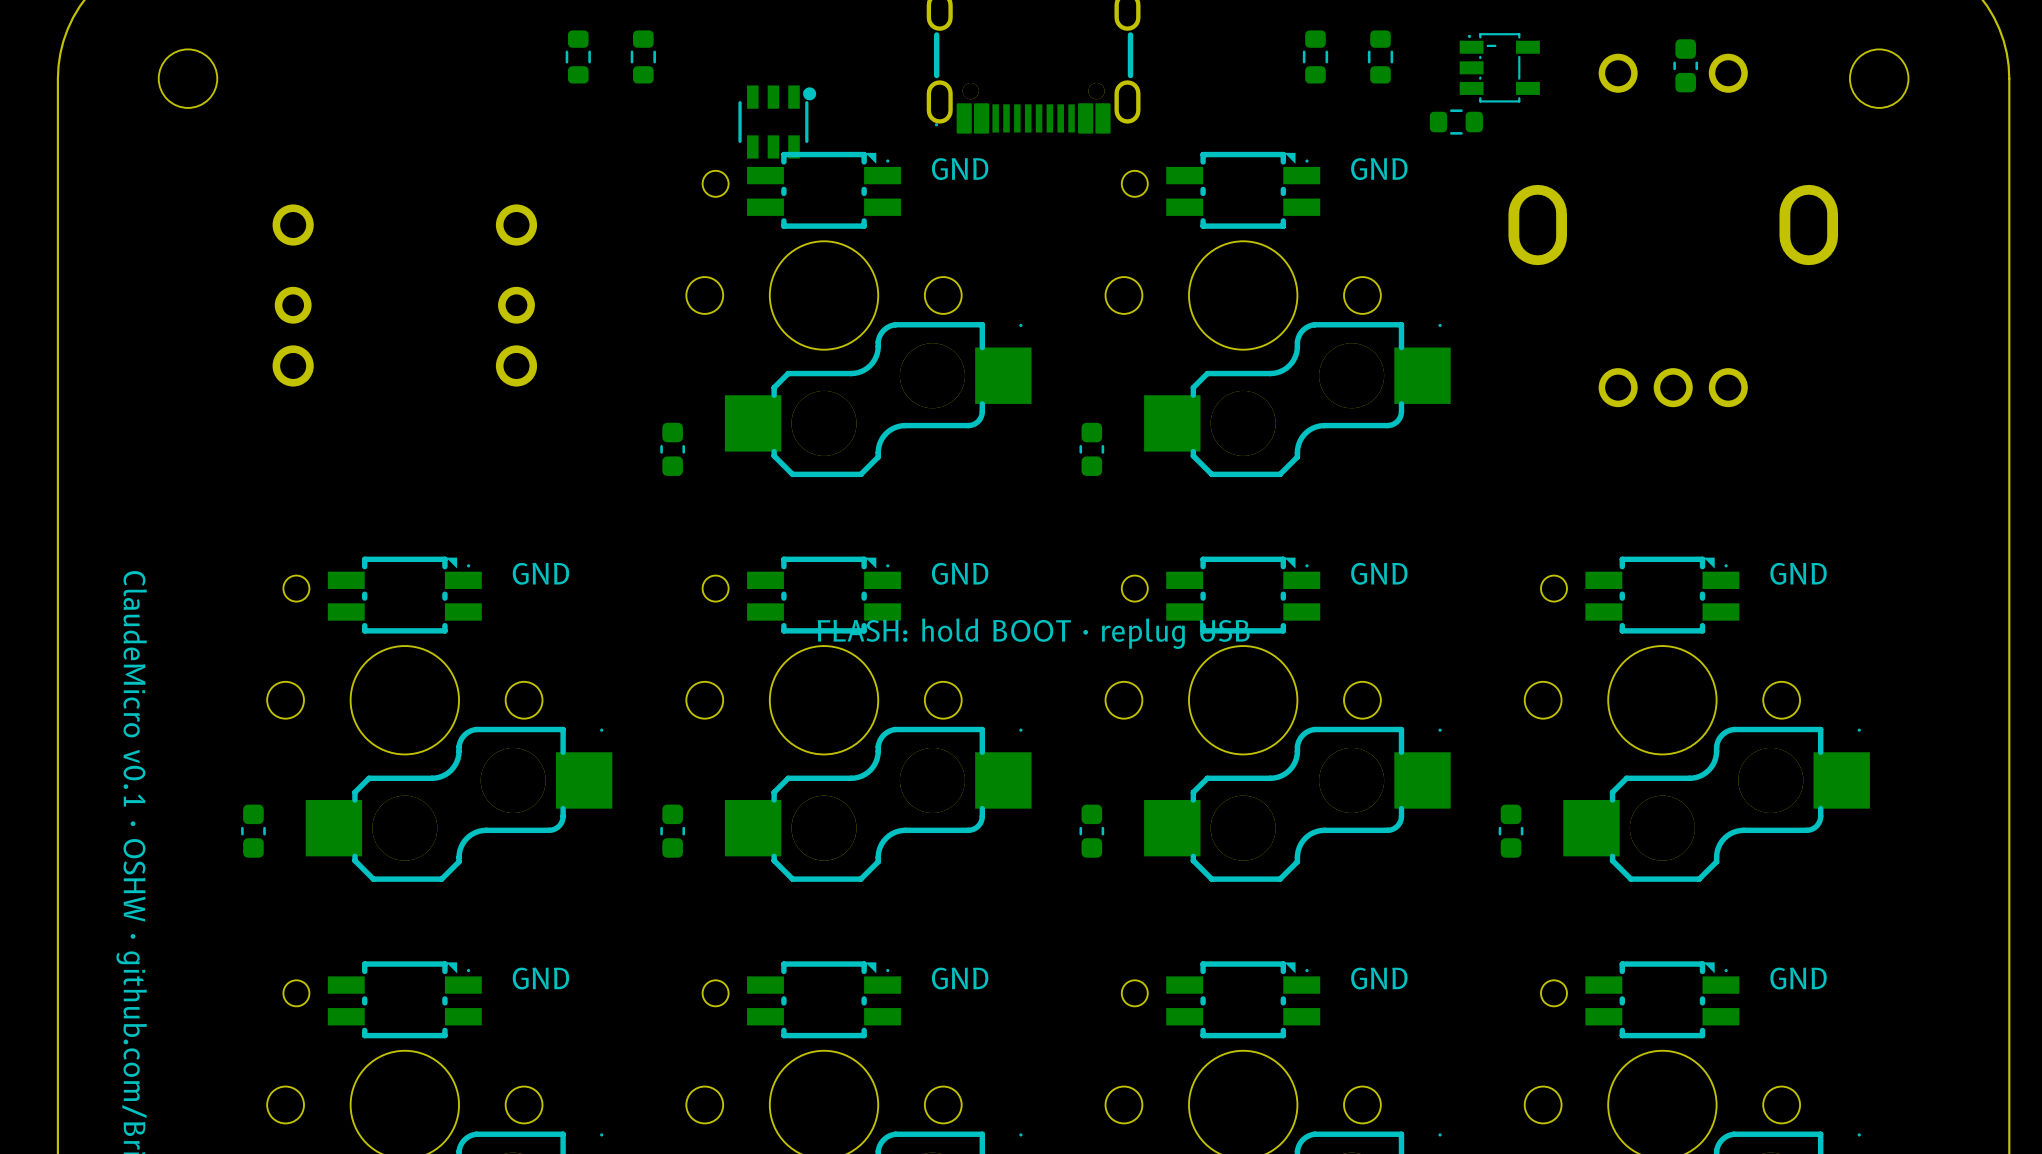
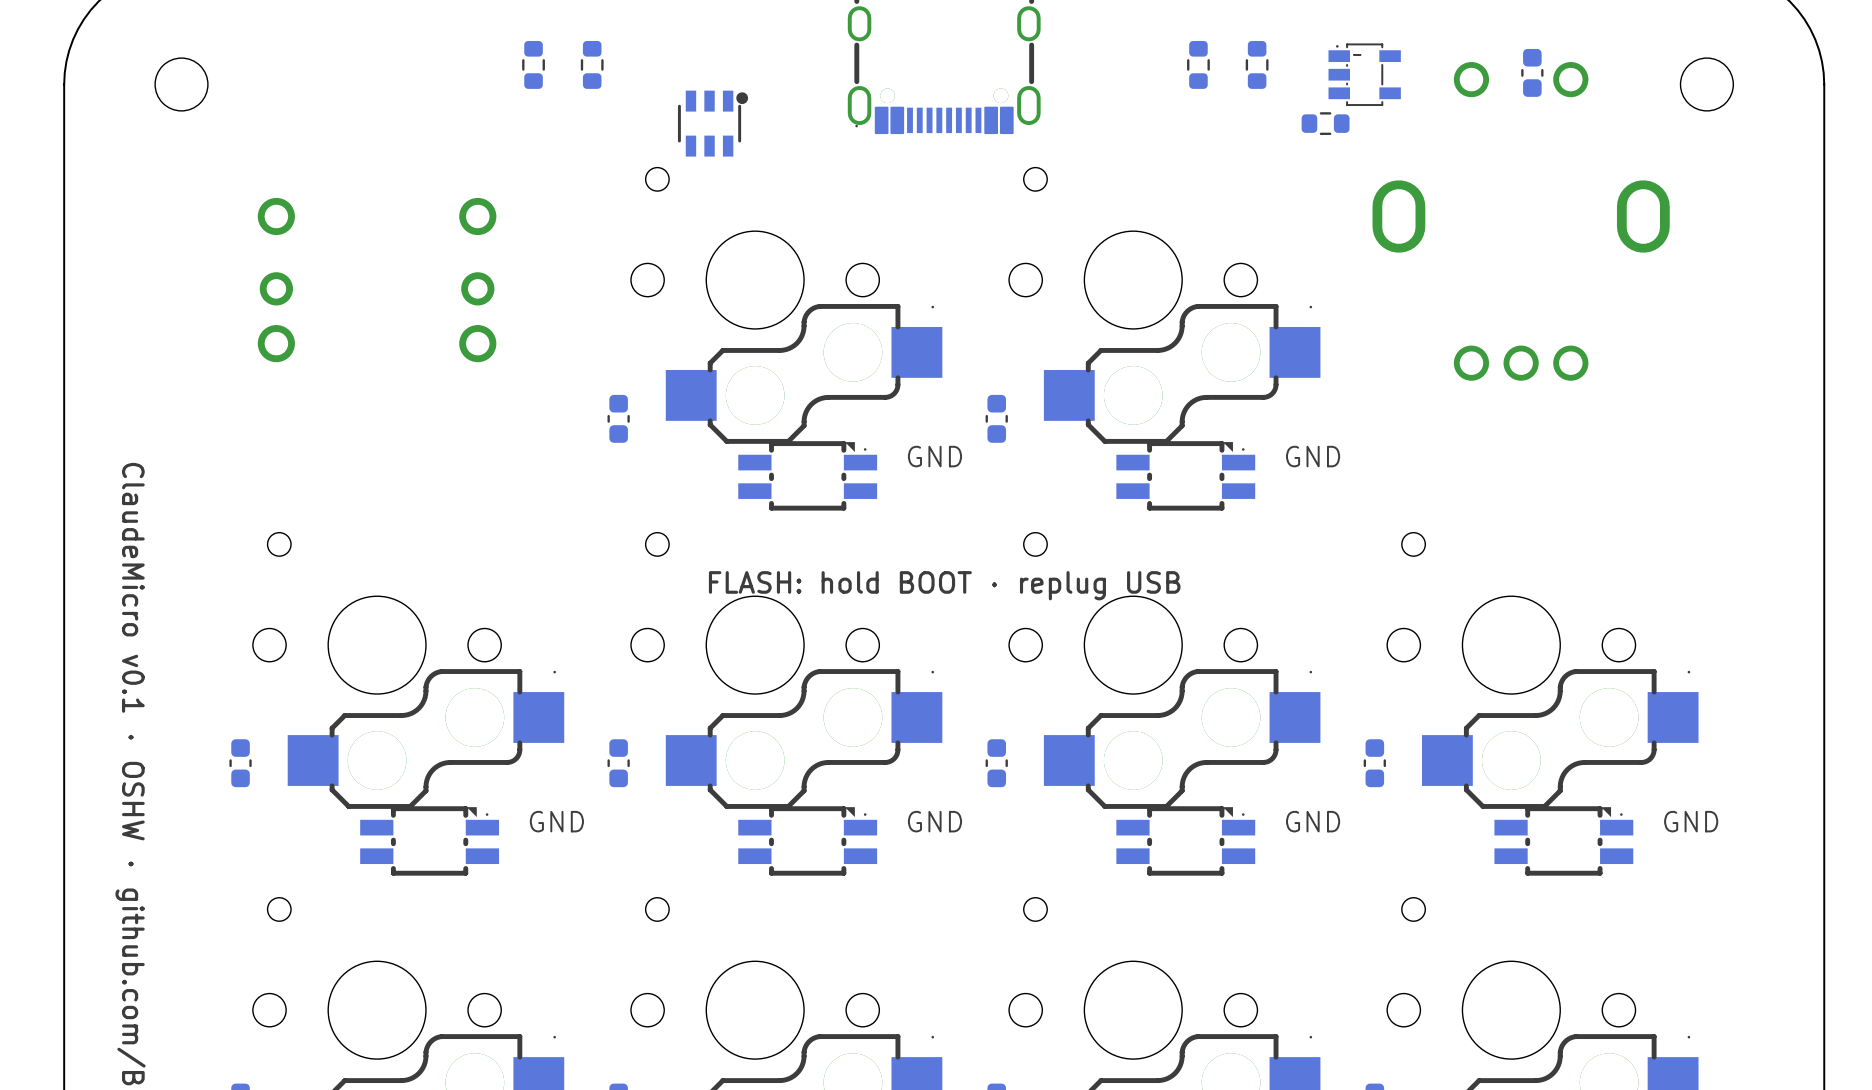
part: (824, 190) -> none
part: (1243, 190) -> none
part: (404, 595) -> none
part position: (824, 595) -> (807, 475)
part position: (1243, 595) -> (1185, 475)
part: (1662, 595) -> none
part position: (404, 999) -> (429, 840)
part position: (824, 999) -> (807, 840)
part position: (1243, 999) -> (1185, 840)
part position: (1662, 999) -> (1563, 840)

